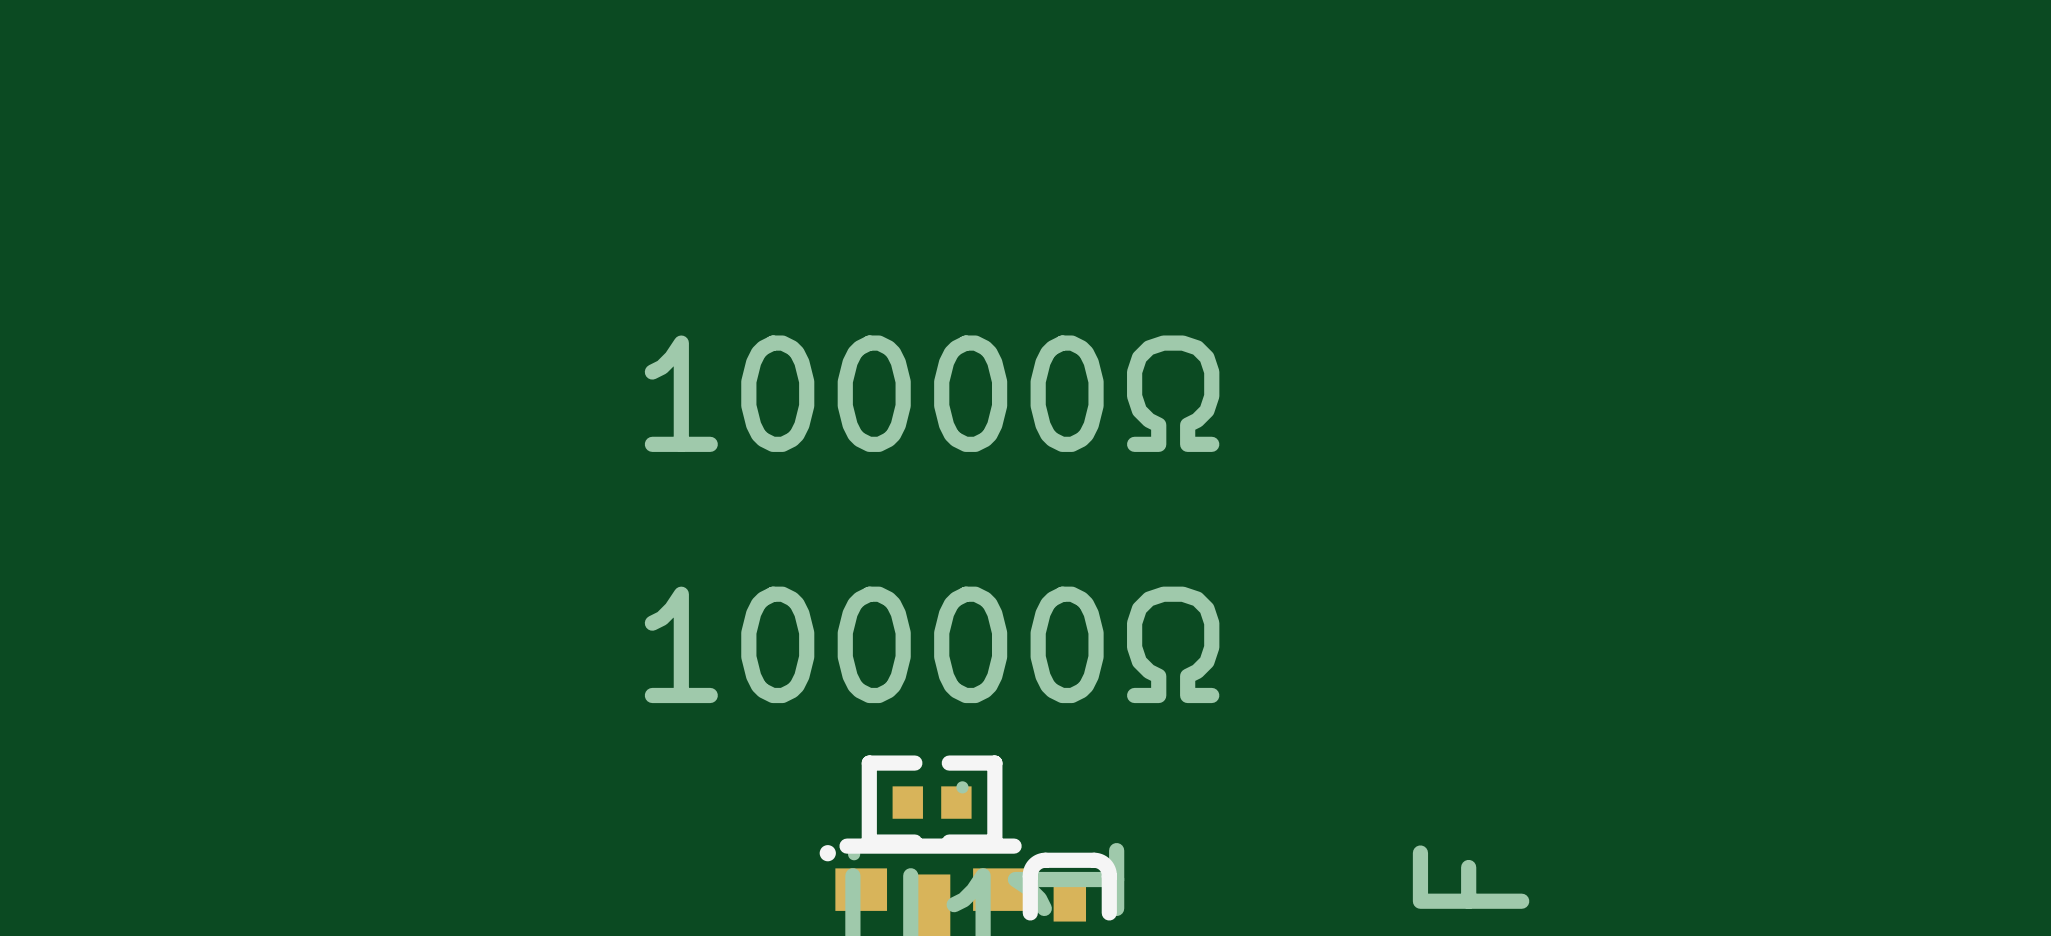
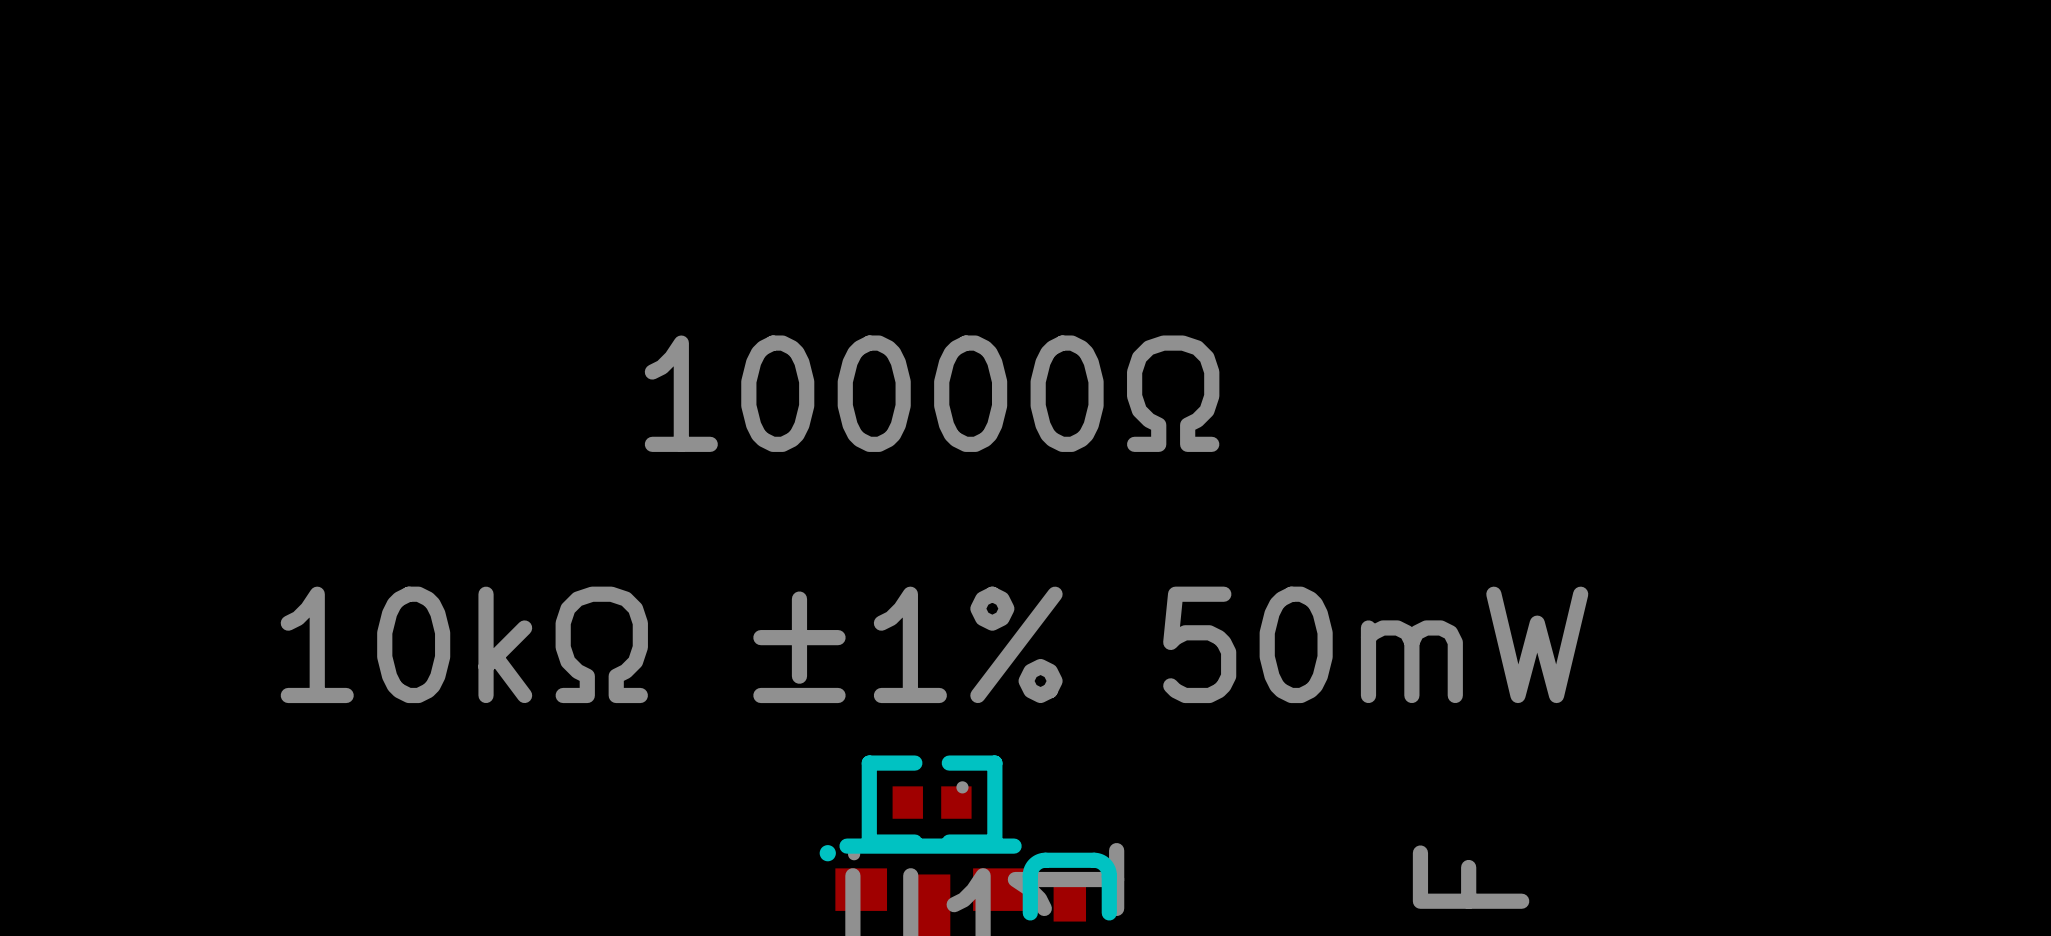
part value: 10000Ω (932, 644) -> 10kΩ ±1% 50mW (934, 644)

